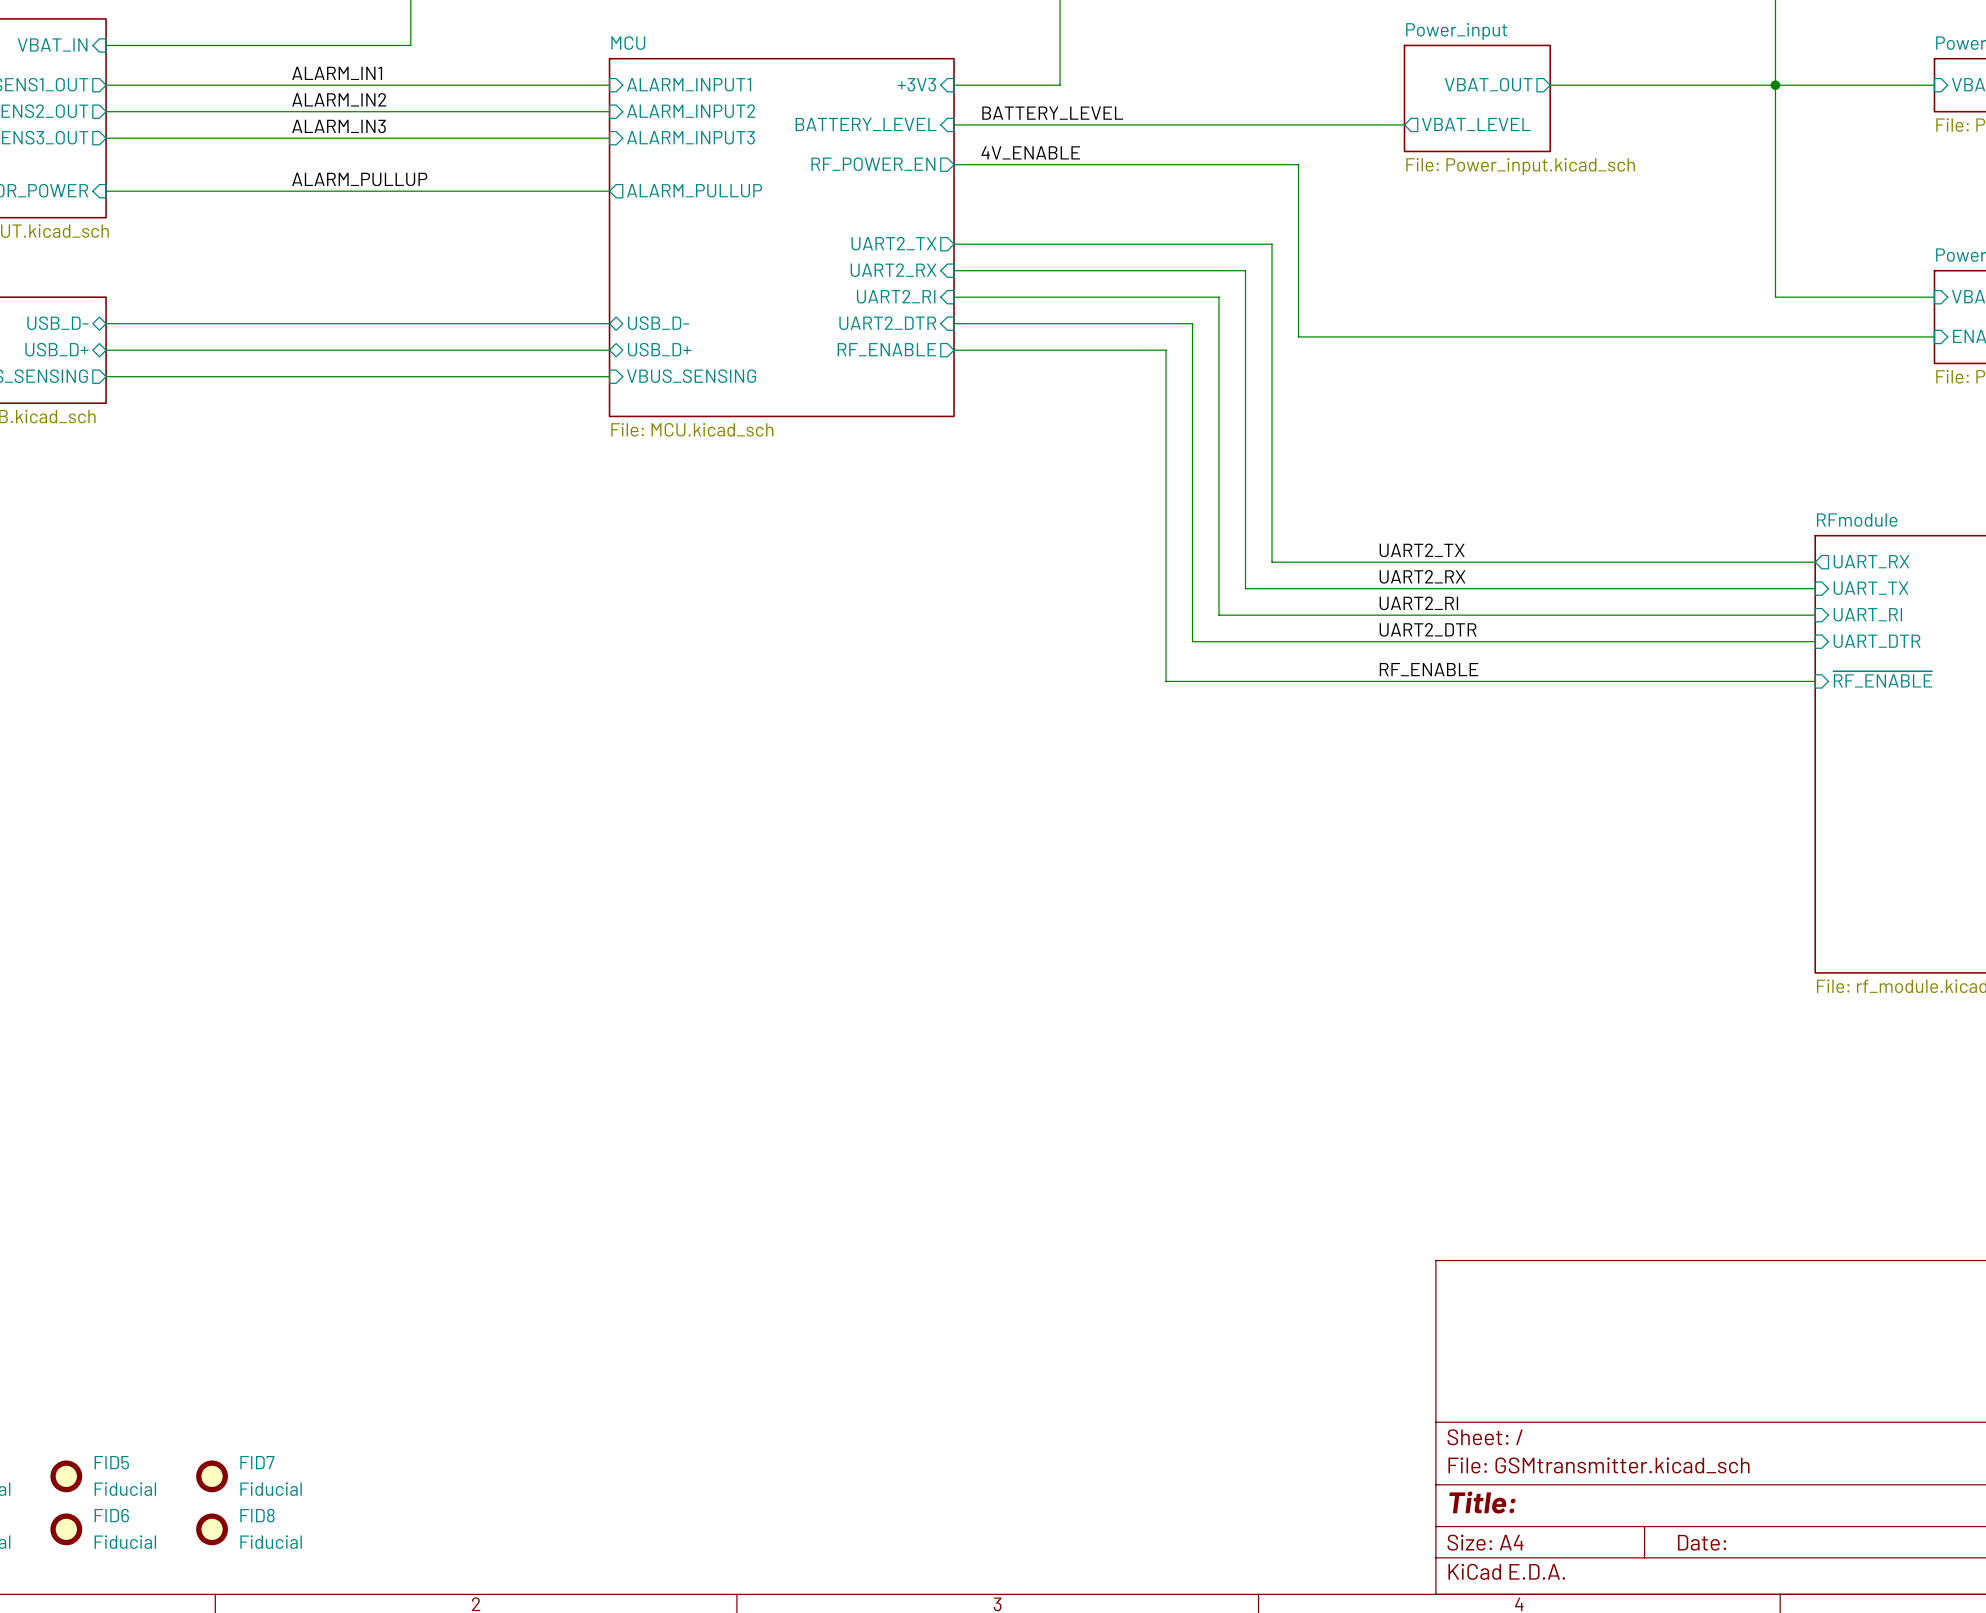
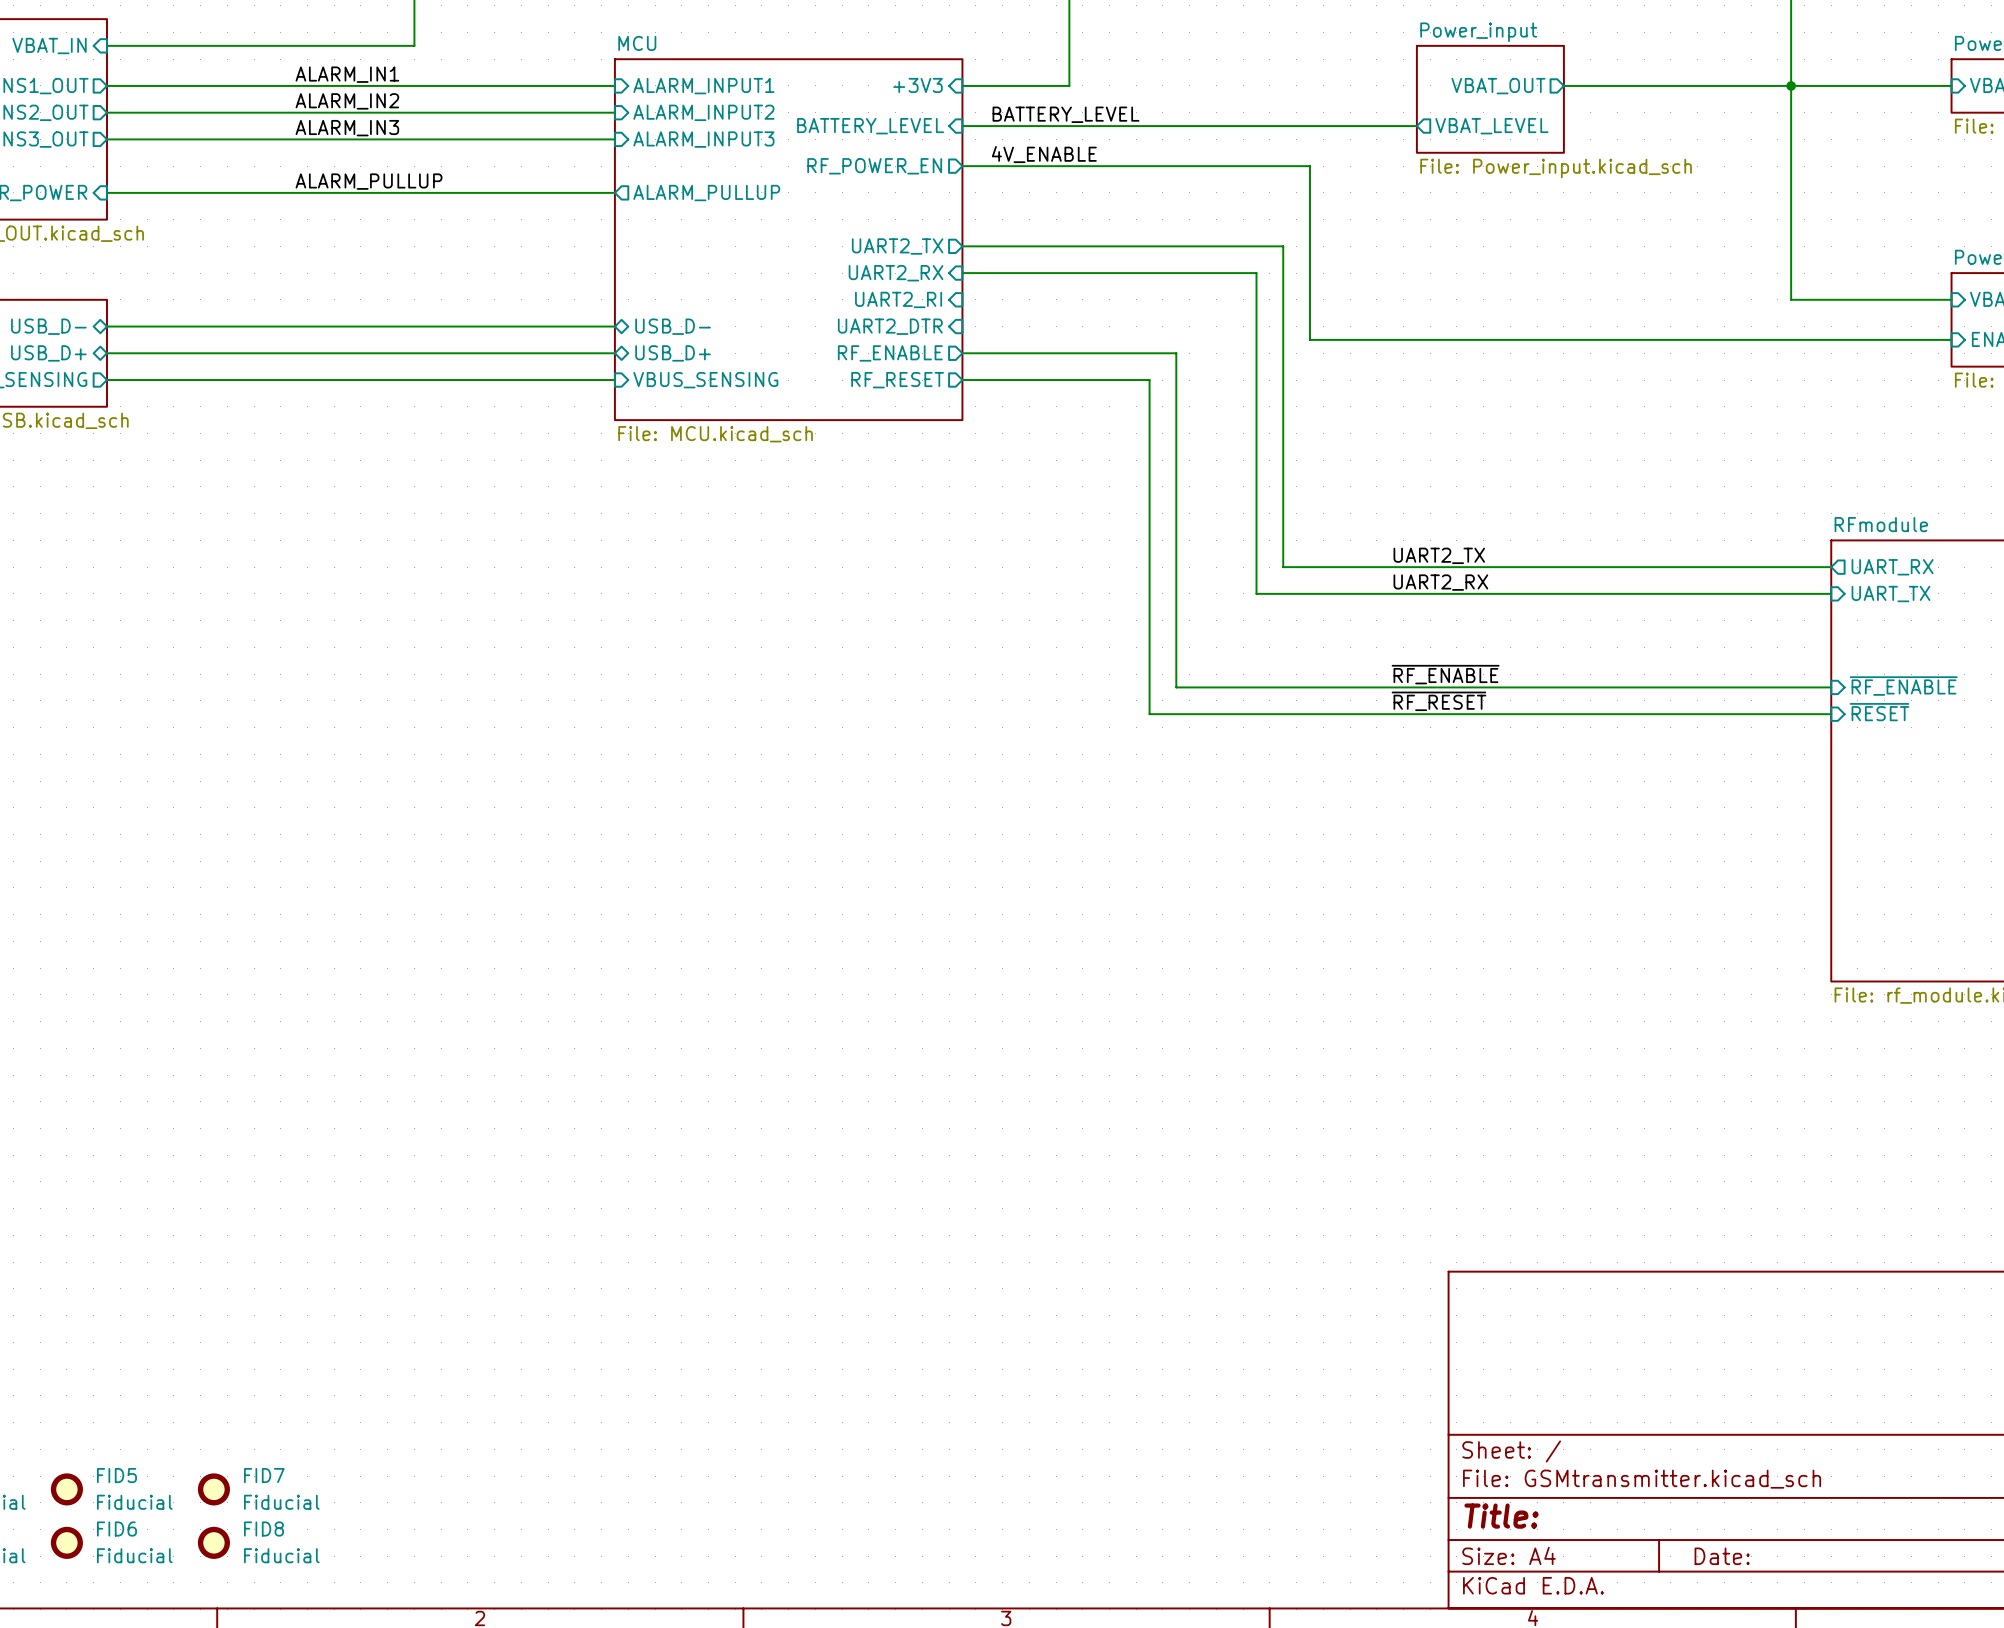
wire: (954, 297) (1219, 297) (1219, 615) (1815, 615) -> none
wire: (954, 323) (1192, 323) (1192, 641) (1815, 641) -> none
sheet pin: none -> RF_RESET (897, 380)
wire: none -> (962, 380) (1149, 380) (1149, 714) (1831, 714)
label: UART2_RI (1418, 603) -> none
sheet pin: UART_RI (1867, 614) -> none
label: UART2_DTR (1428, 629) -> none
sheet pin: UART_DTR (1877, 641) -> none
label: RF_ENABLE (1428, 669) -> ~{RF_ENABLE} (1445, 674)
label: none -> ~{RF_RESET} (1438, 701)
sheet pin: none -> ~{RESET} (1879, 712)

